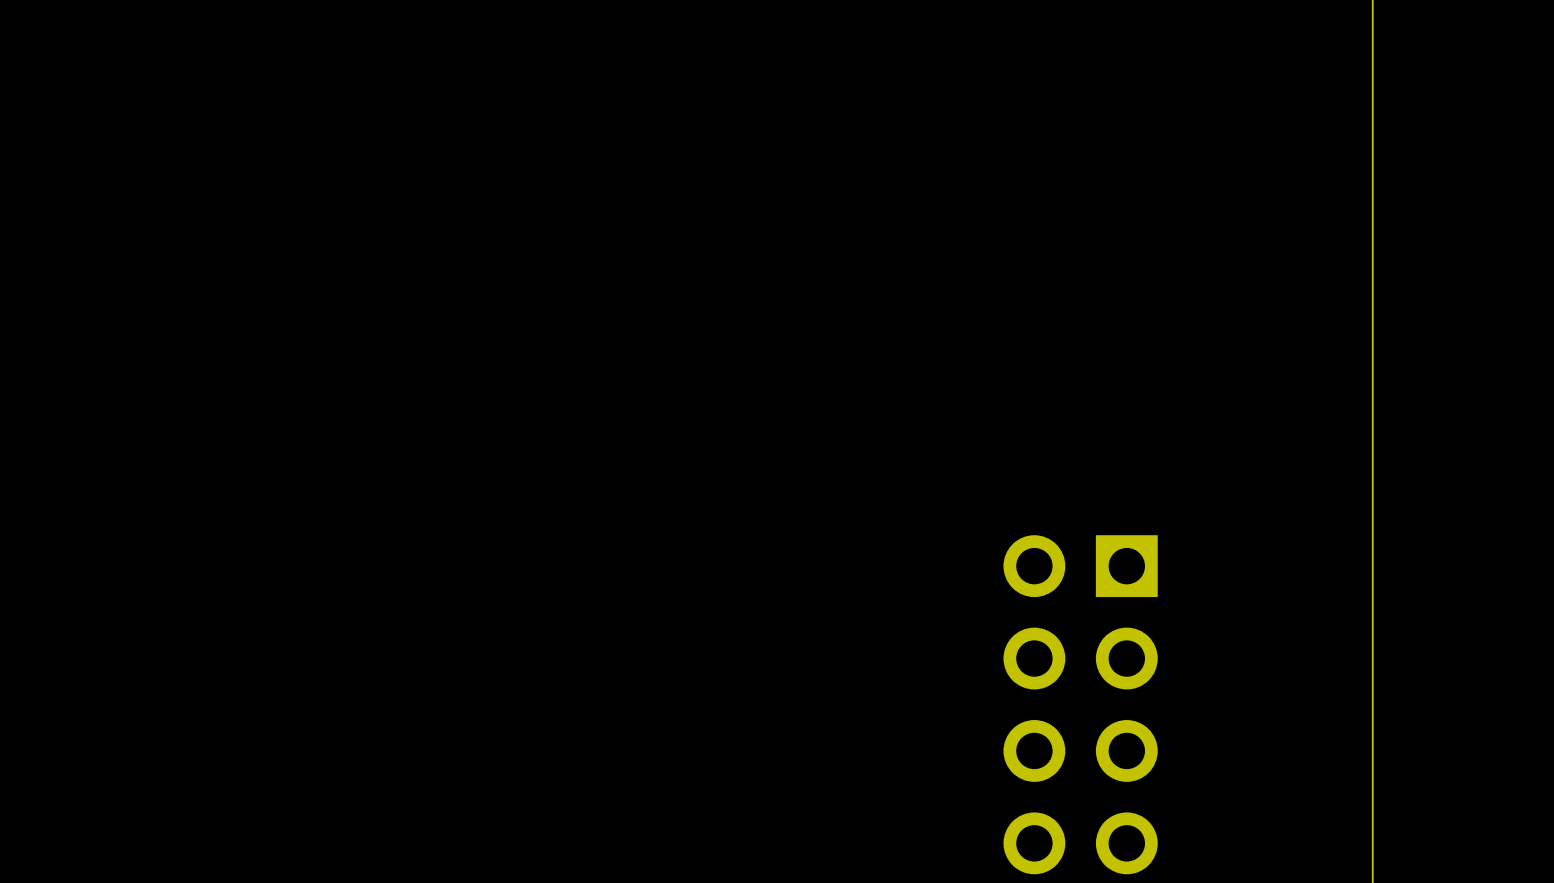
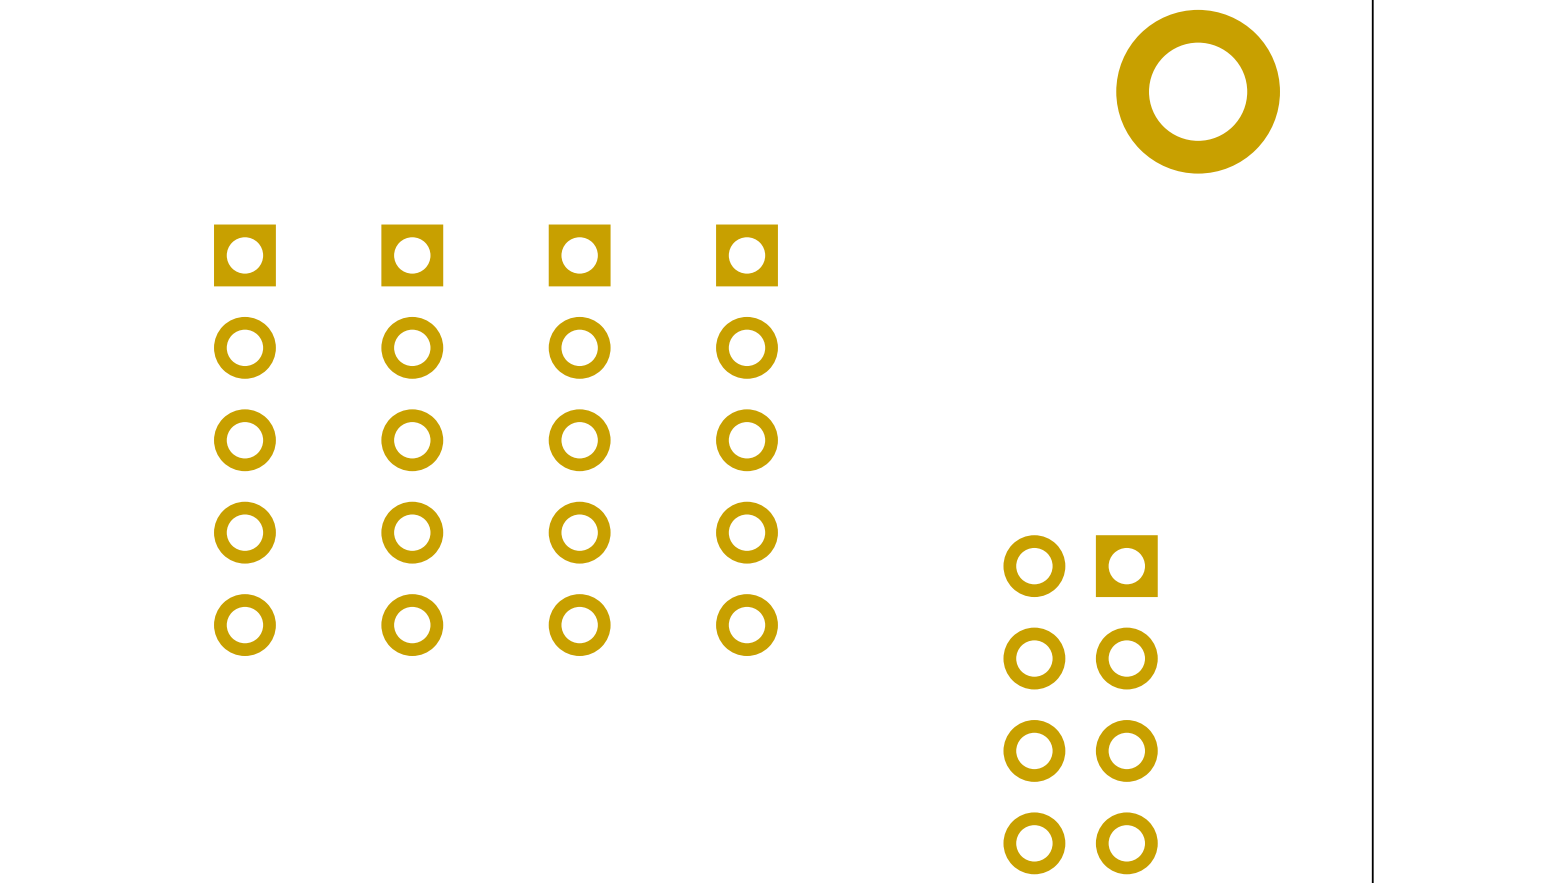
part: none -> (1198, 91)
part: none -> (244, 440)
part: none -> (412, 440)
part: none -> (579, 440)
part: none -> (747, 440)

